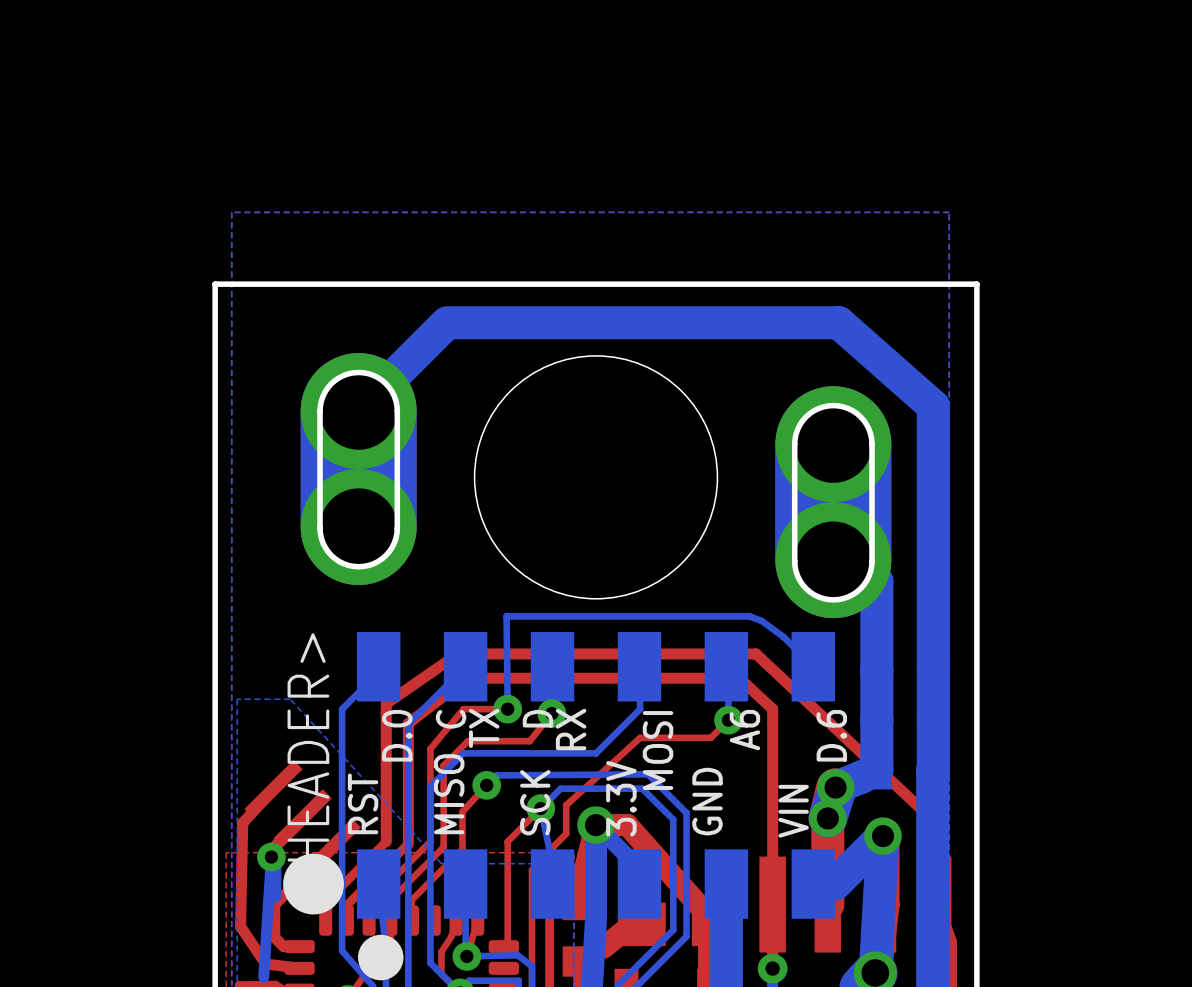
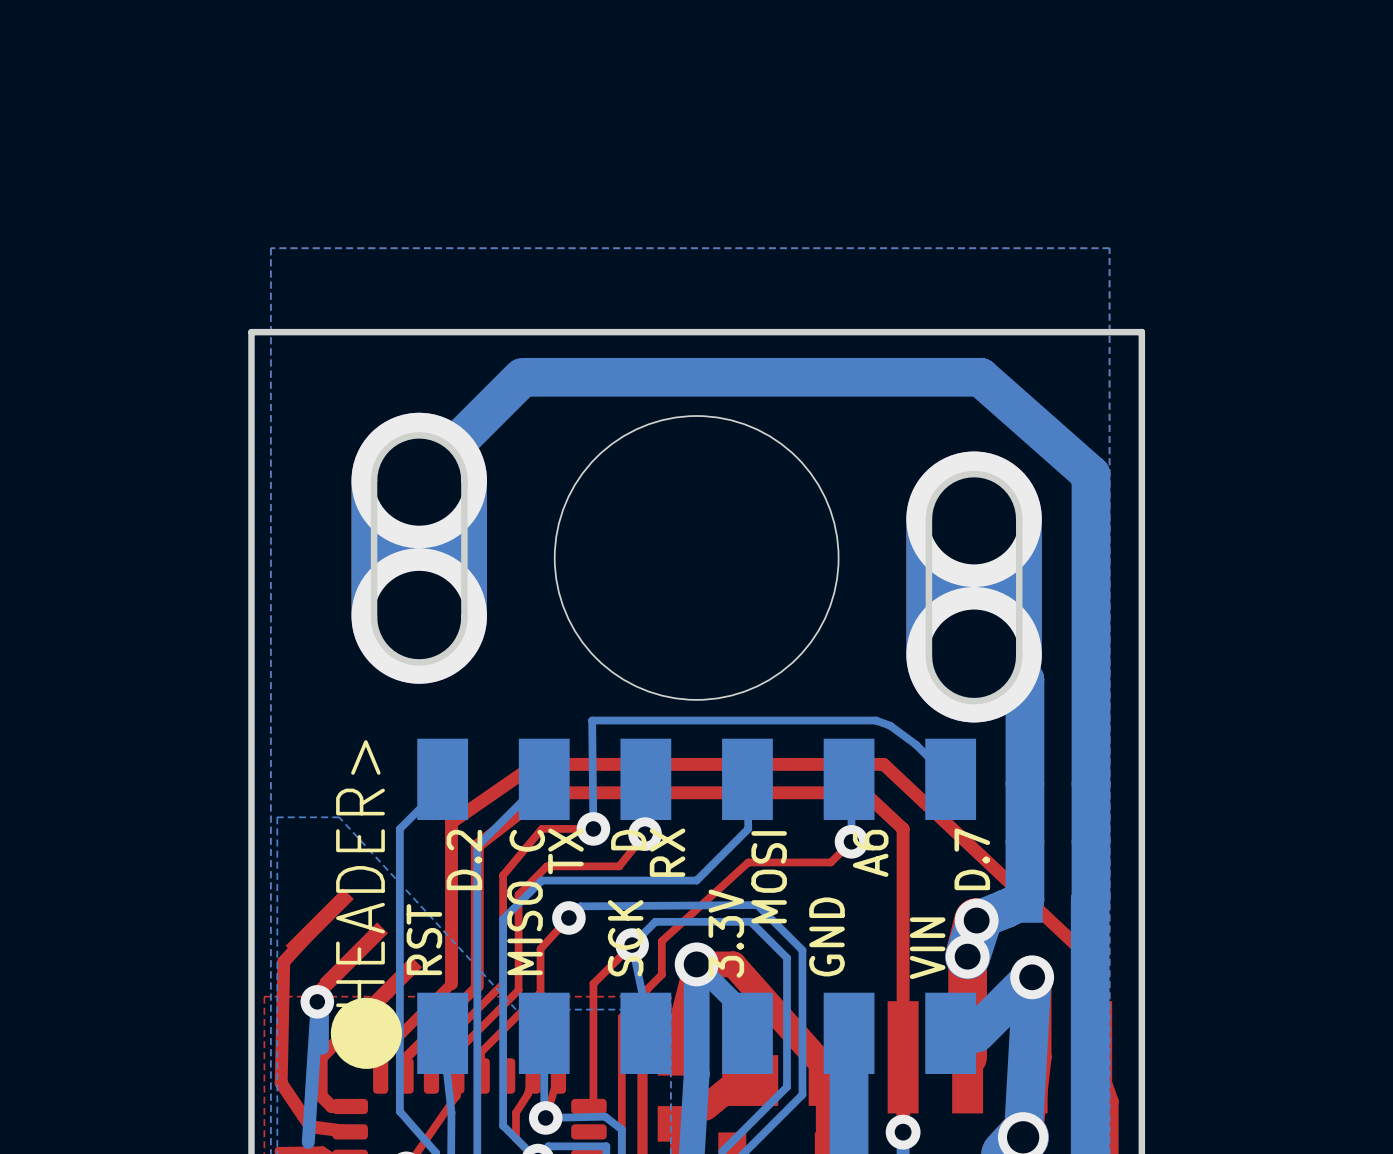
text: D.0 (397, 735) -> D.2 (464, 860)
text: D.6 (831, 735) -> D.7 (972, 859)
drawing: [357, 934, 404, 981] -> none

